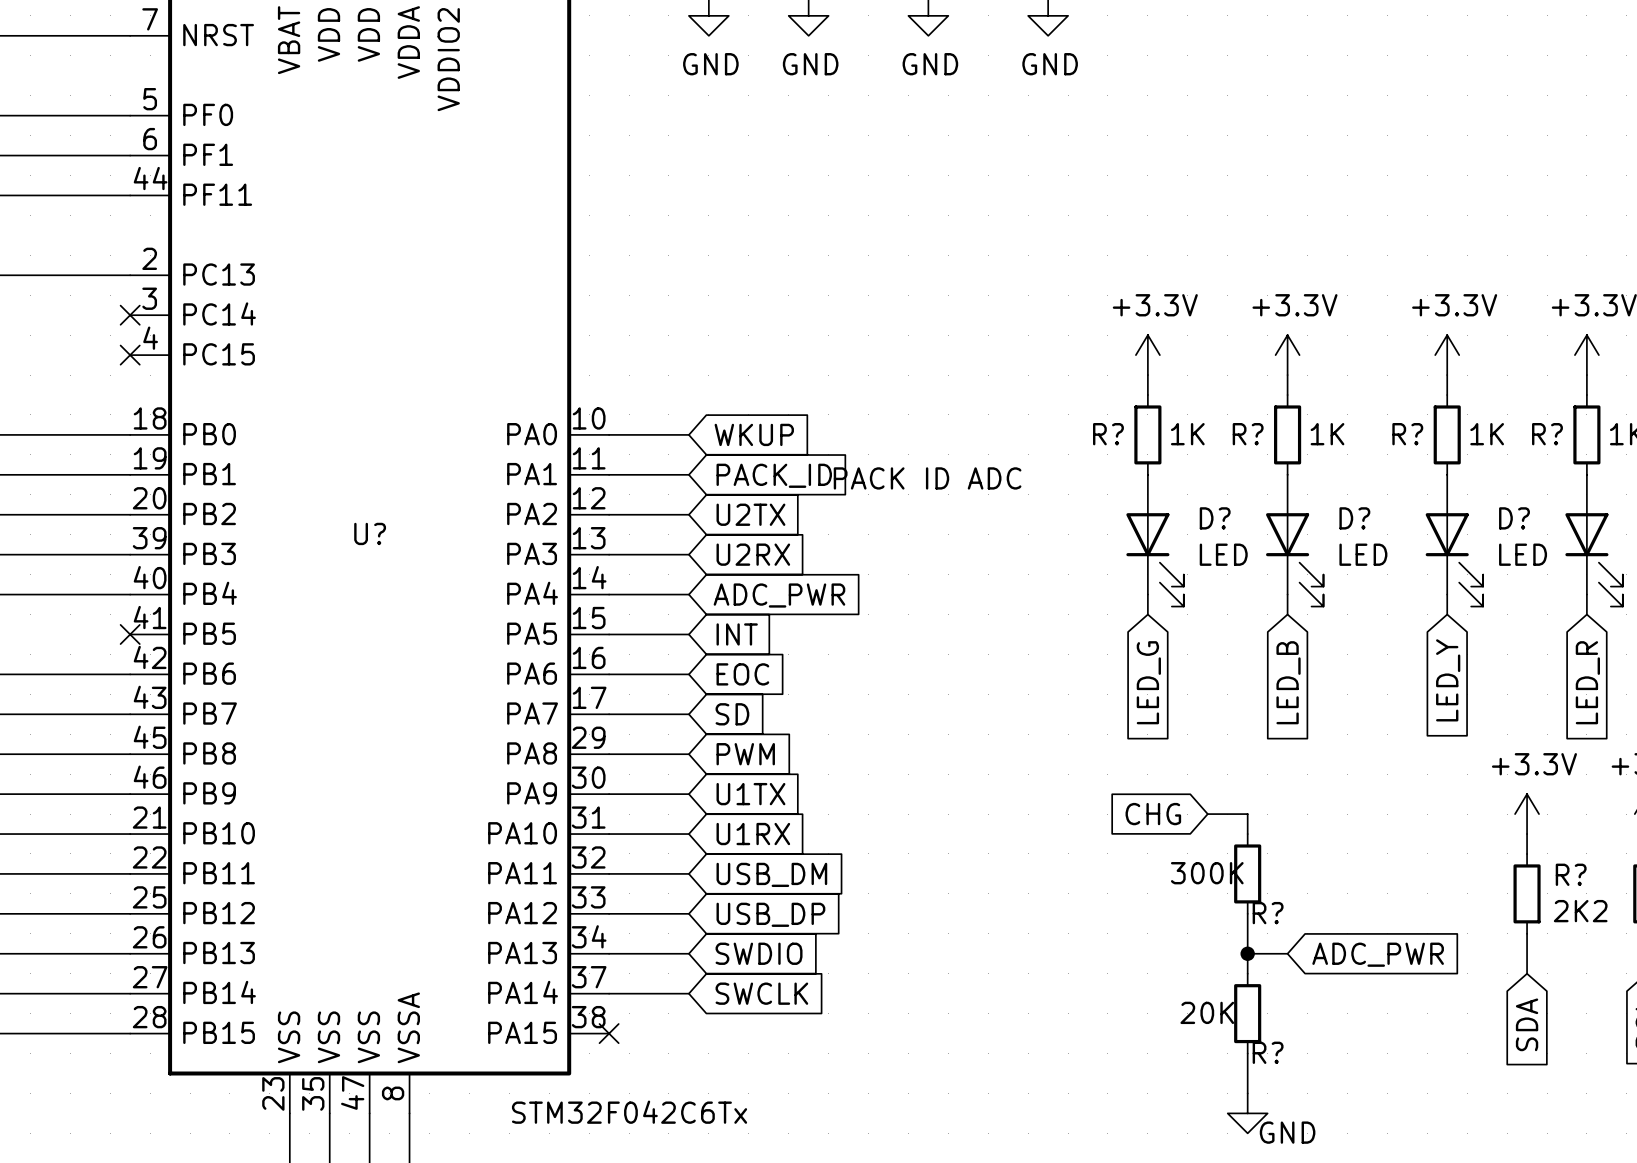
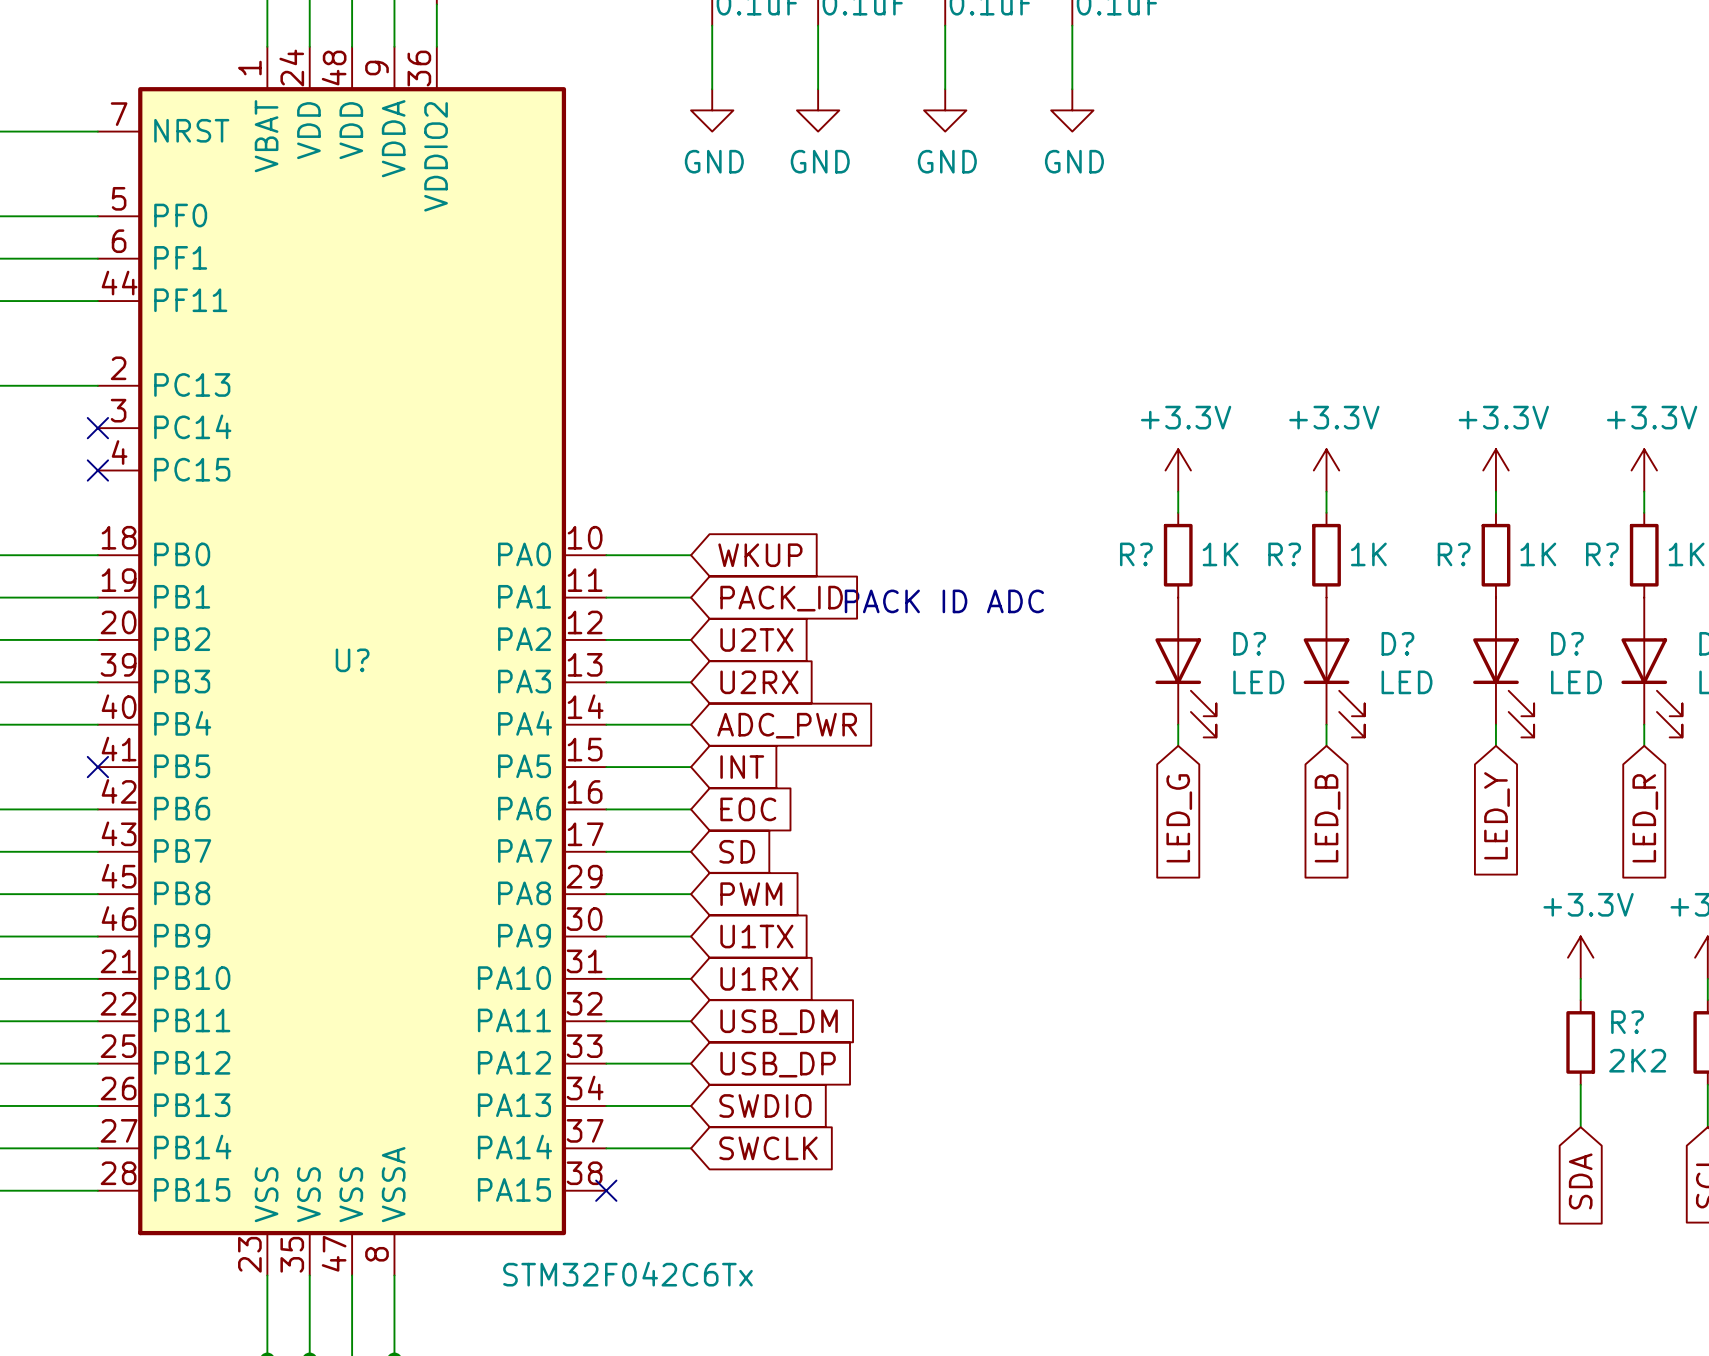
global label: CHG (1153, 814) -> none
wire: (1207, 814) (1247, 814) (1247, 834) -> none
R?: 300K (1247, 873) -> none
wire: (1247, 913) (1247, 973) -> none
wire: (1247, 953) (1287, 953) -> none
junction: (1247, 953) -> none
global label: ADC_PWR (1378, 954) -> none
R?: 20K (1247, 1013) -> none
wire: (1247, 1053) (1247, 1093) -> none
power symbol: GND (1247, 1113) -> none

